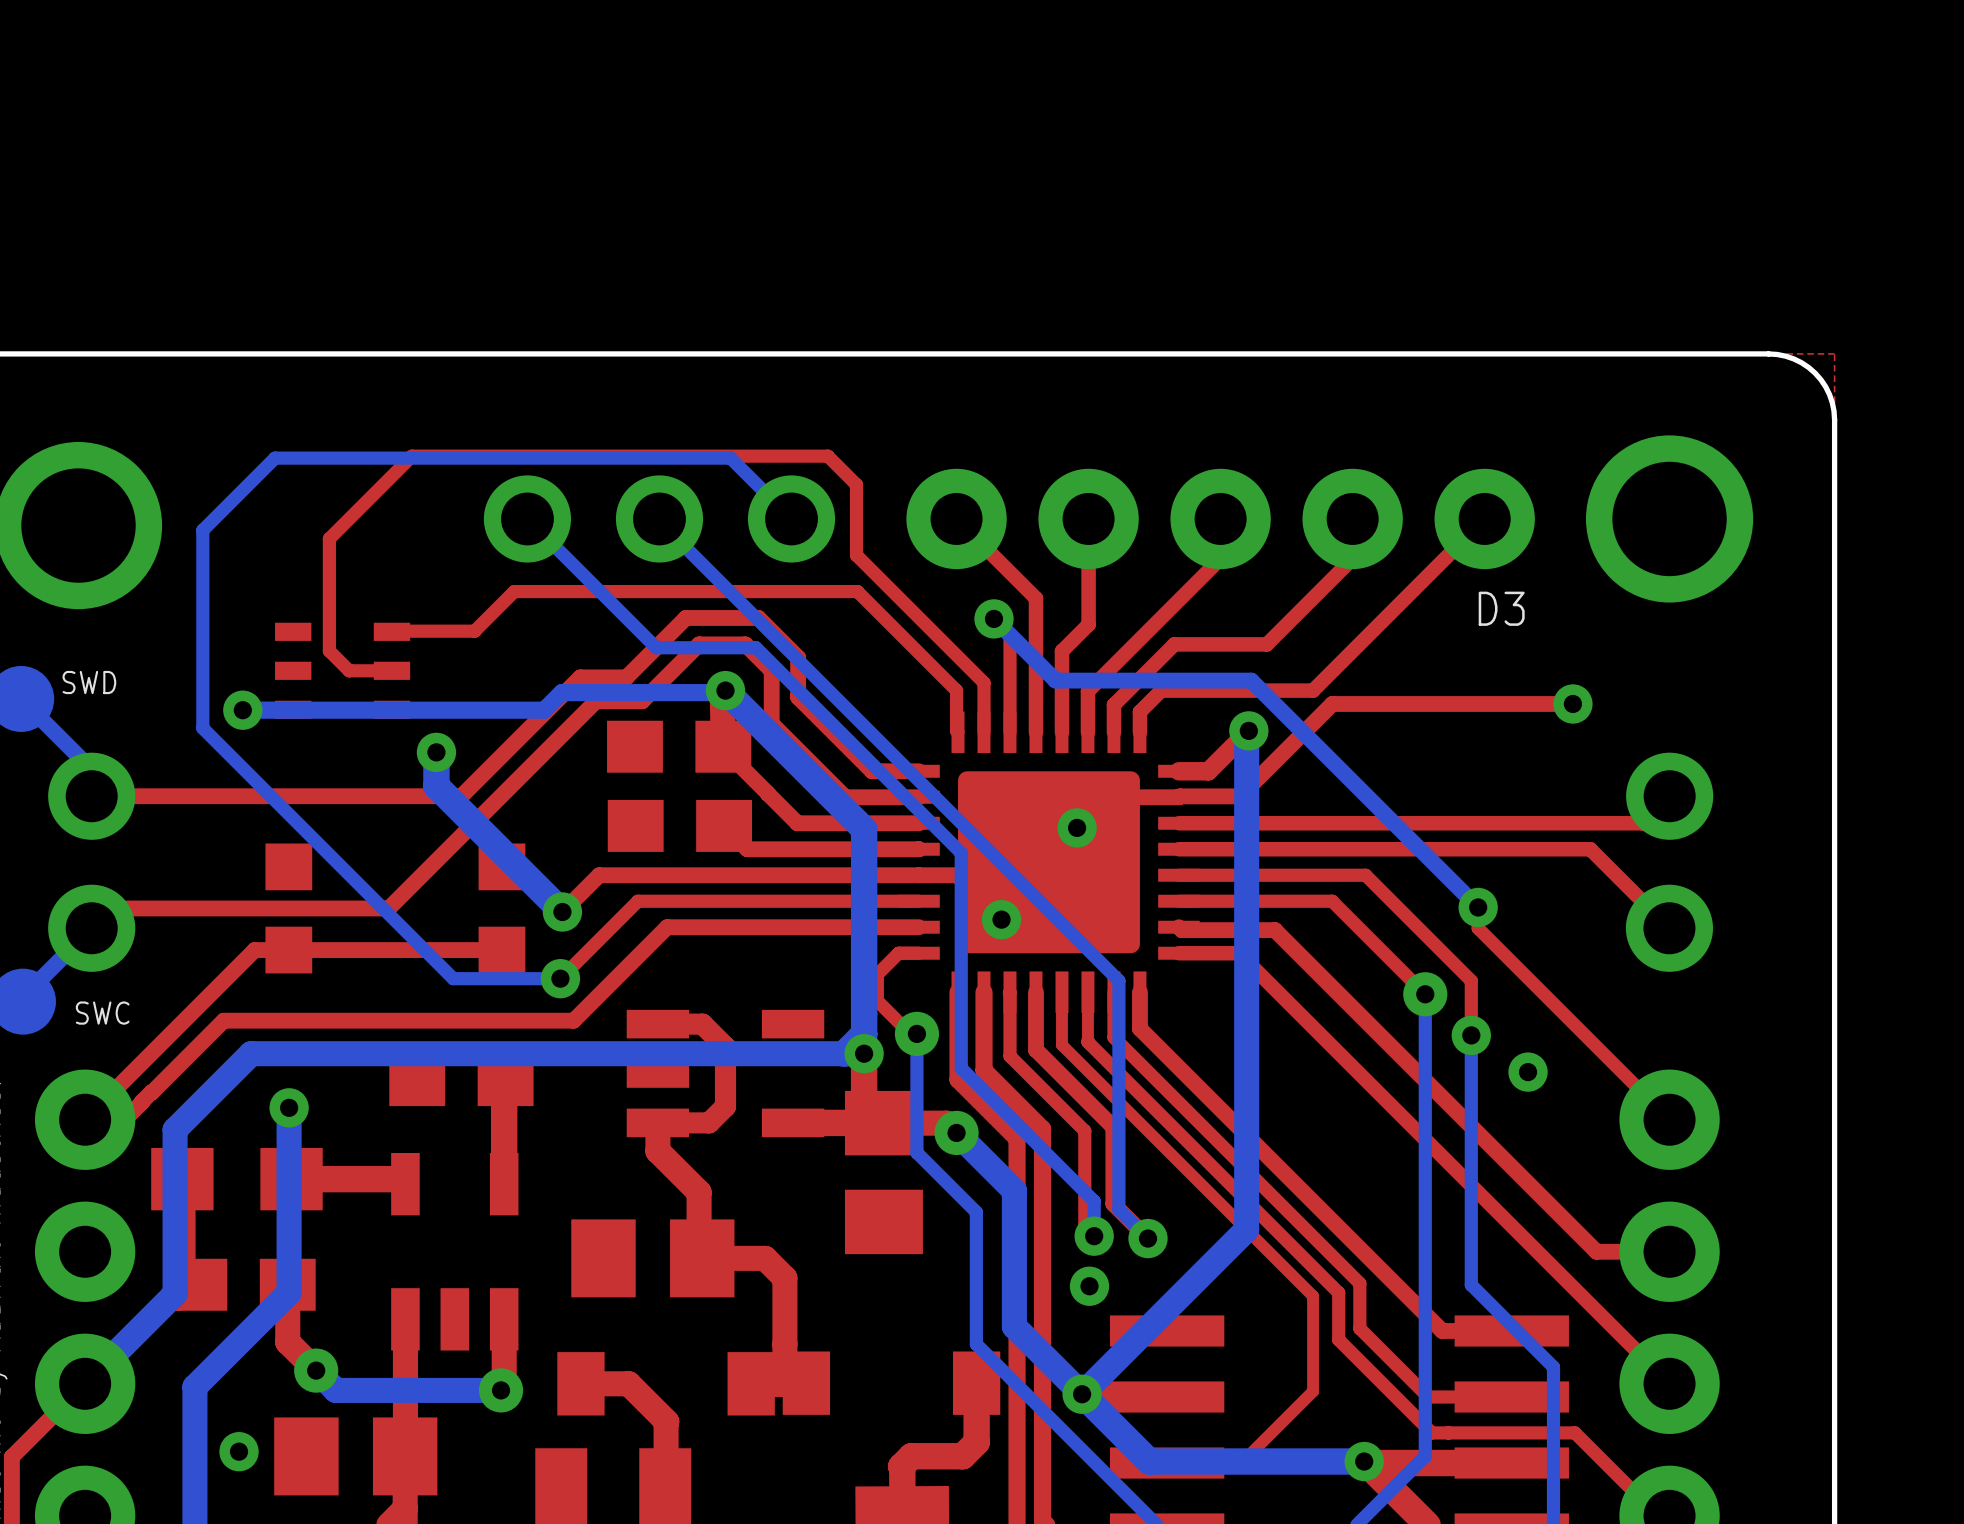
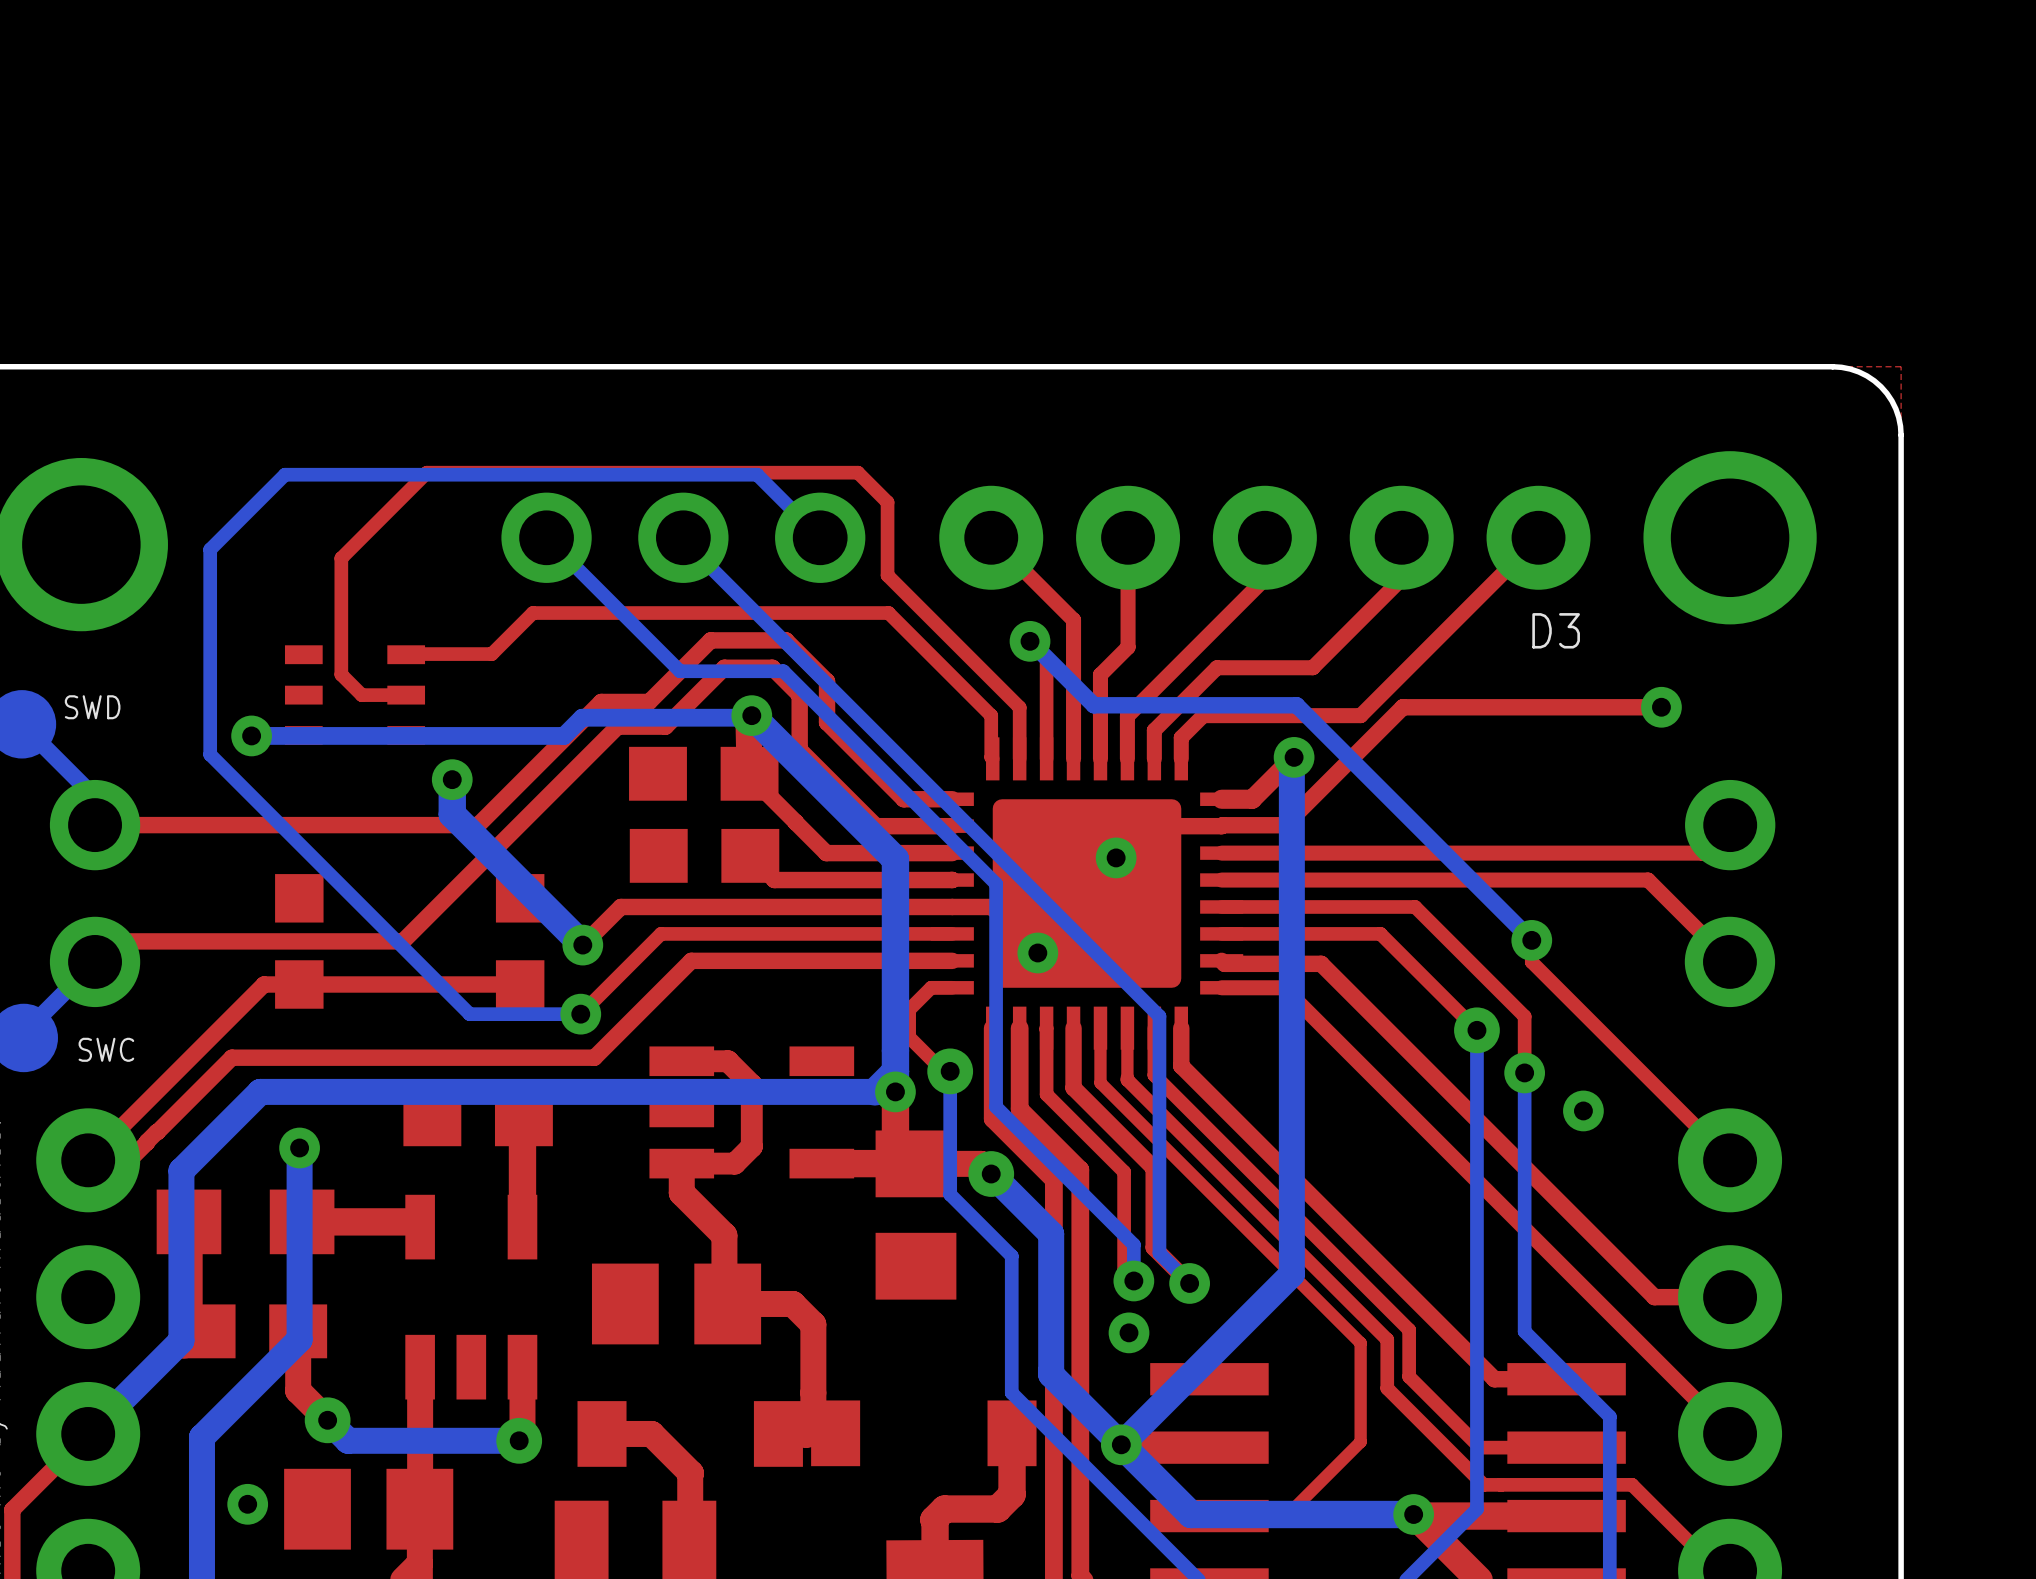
top track: (1572, 703) (1332, 703) -> (1661, 707) (1402, 707) (1380, 729)
via position: (1572, 703) -> (1661, 707)

